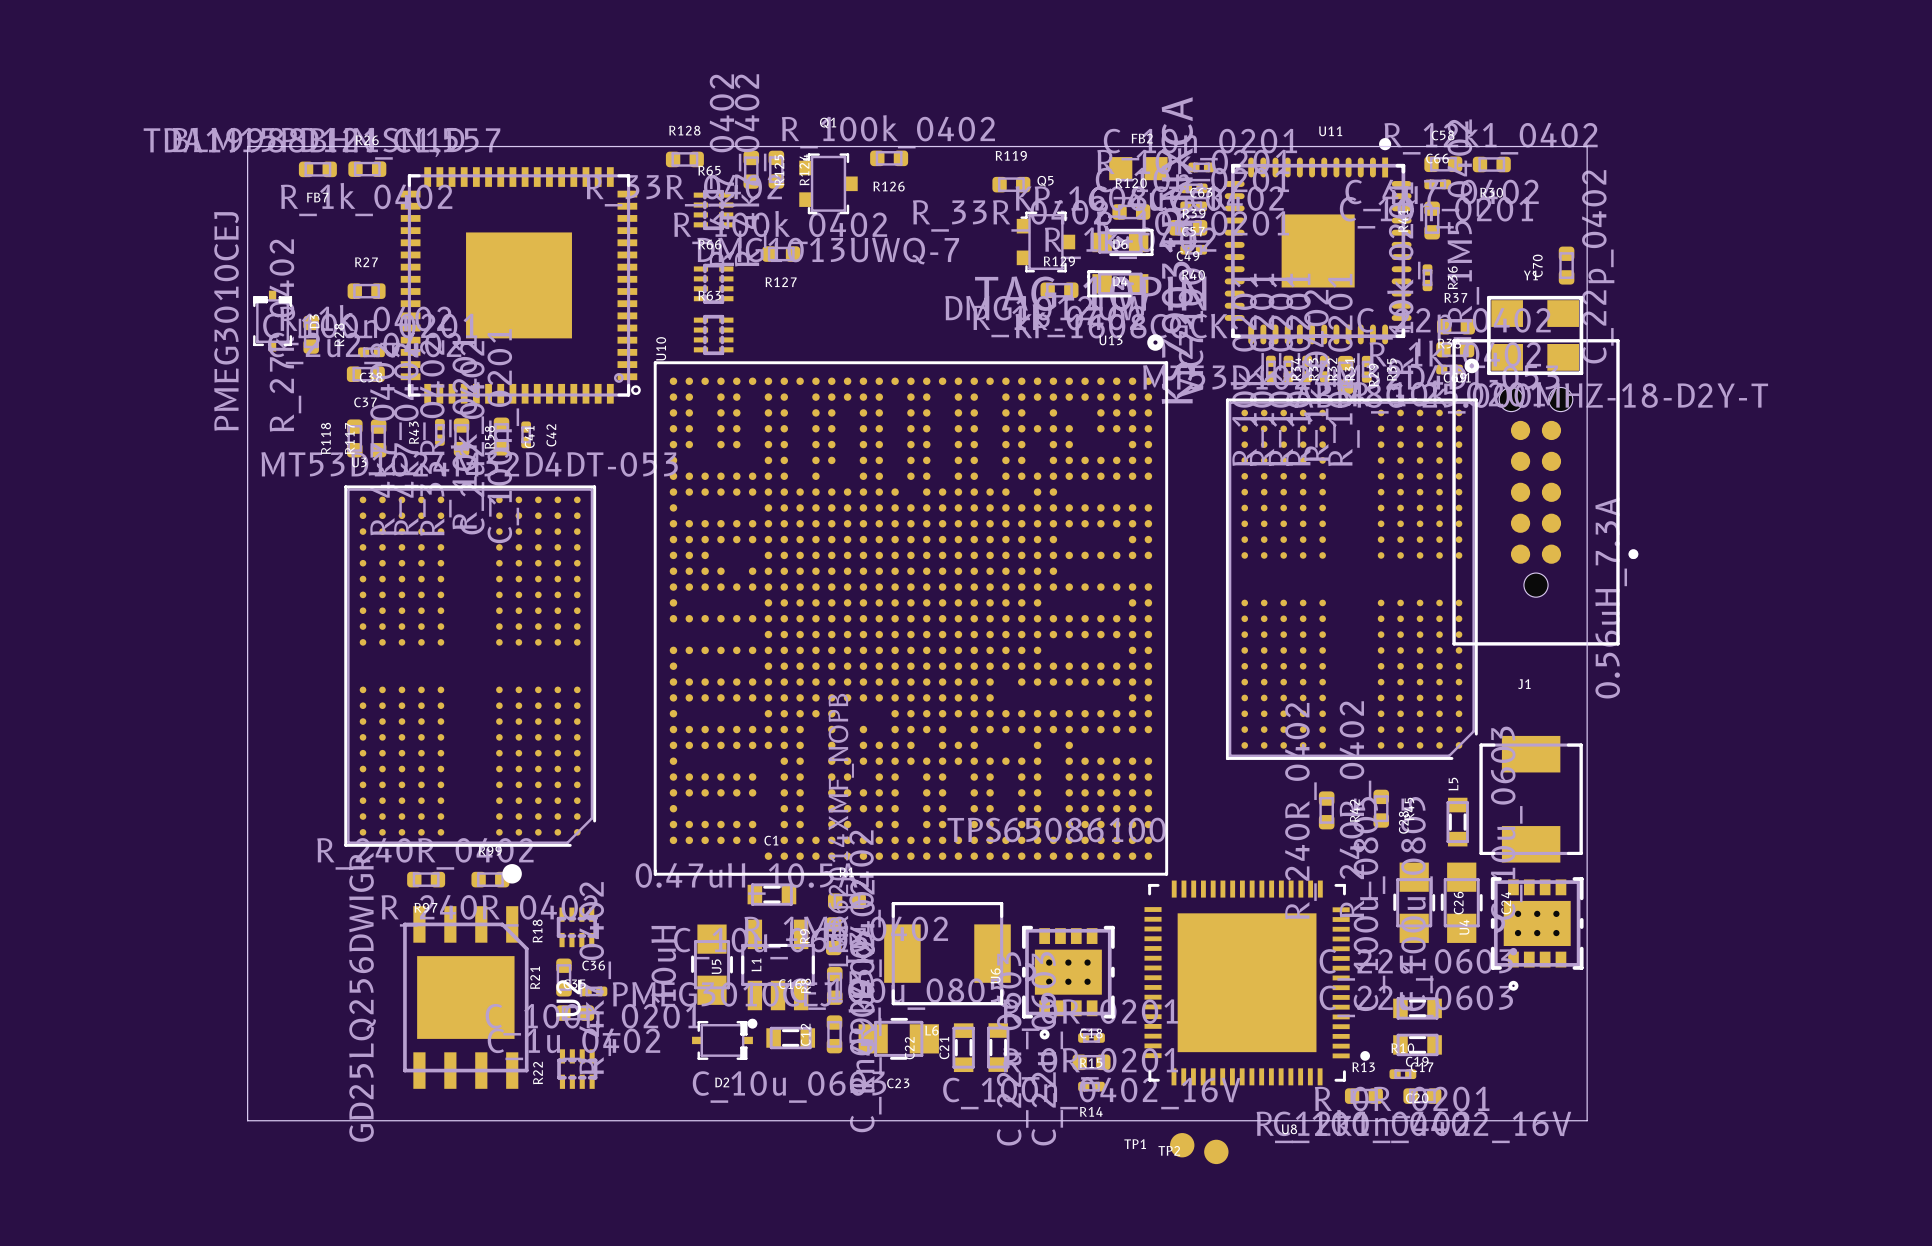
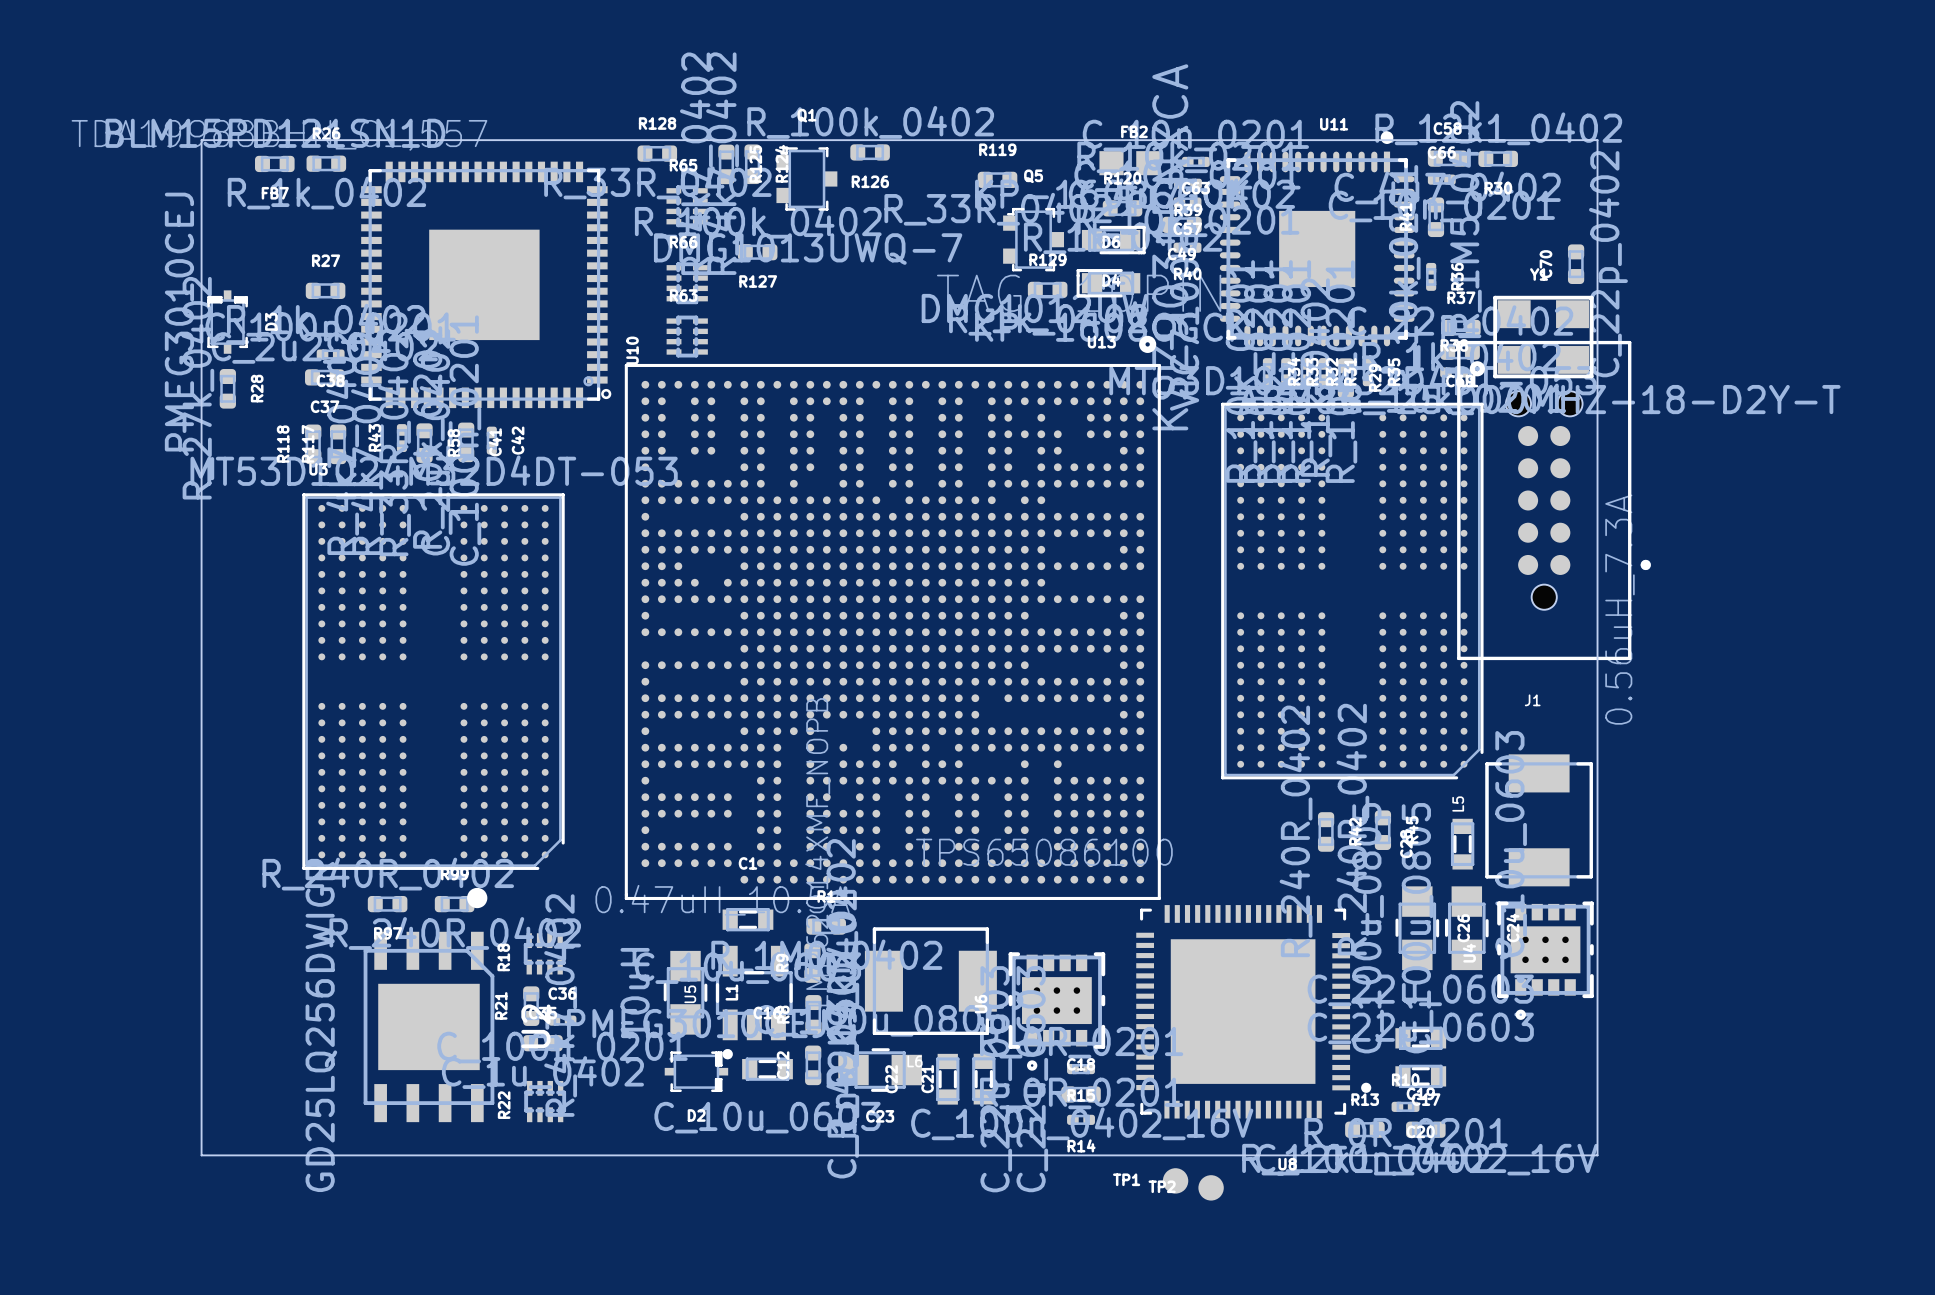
R28 position: (311, 334) -> (227, 388)

